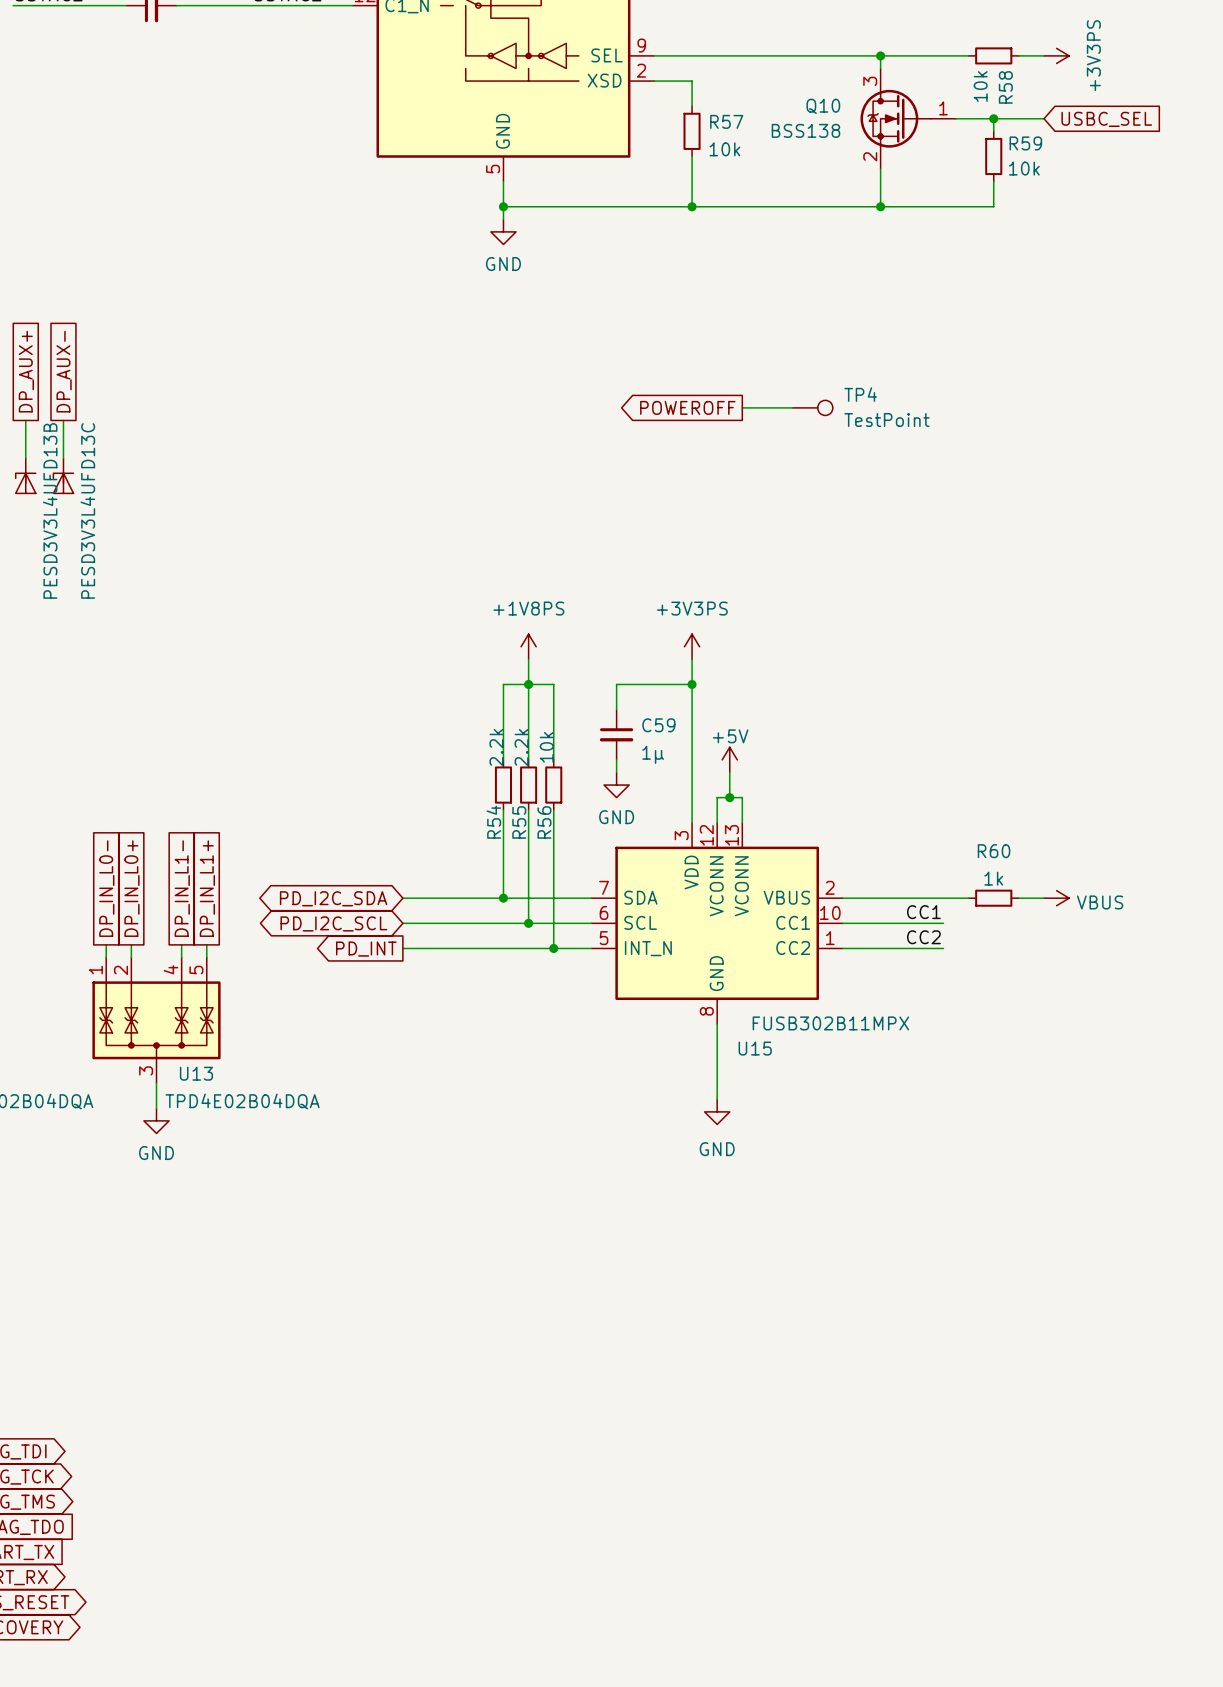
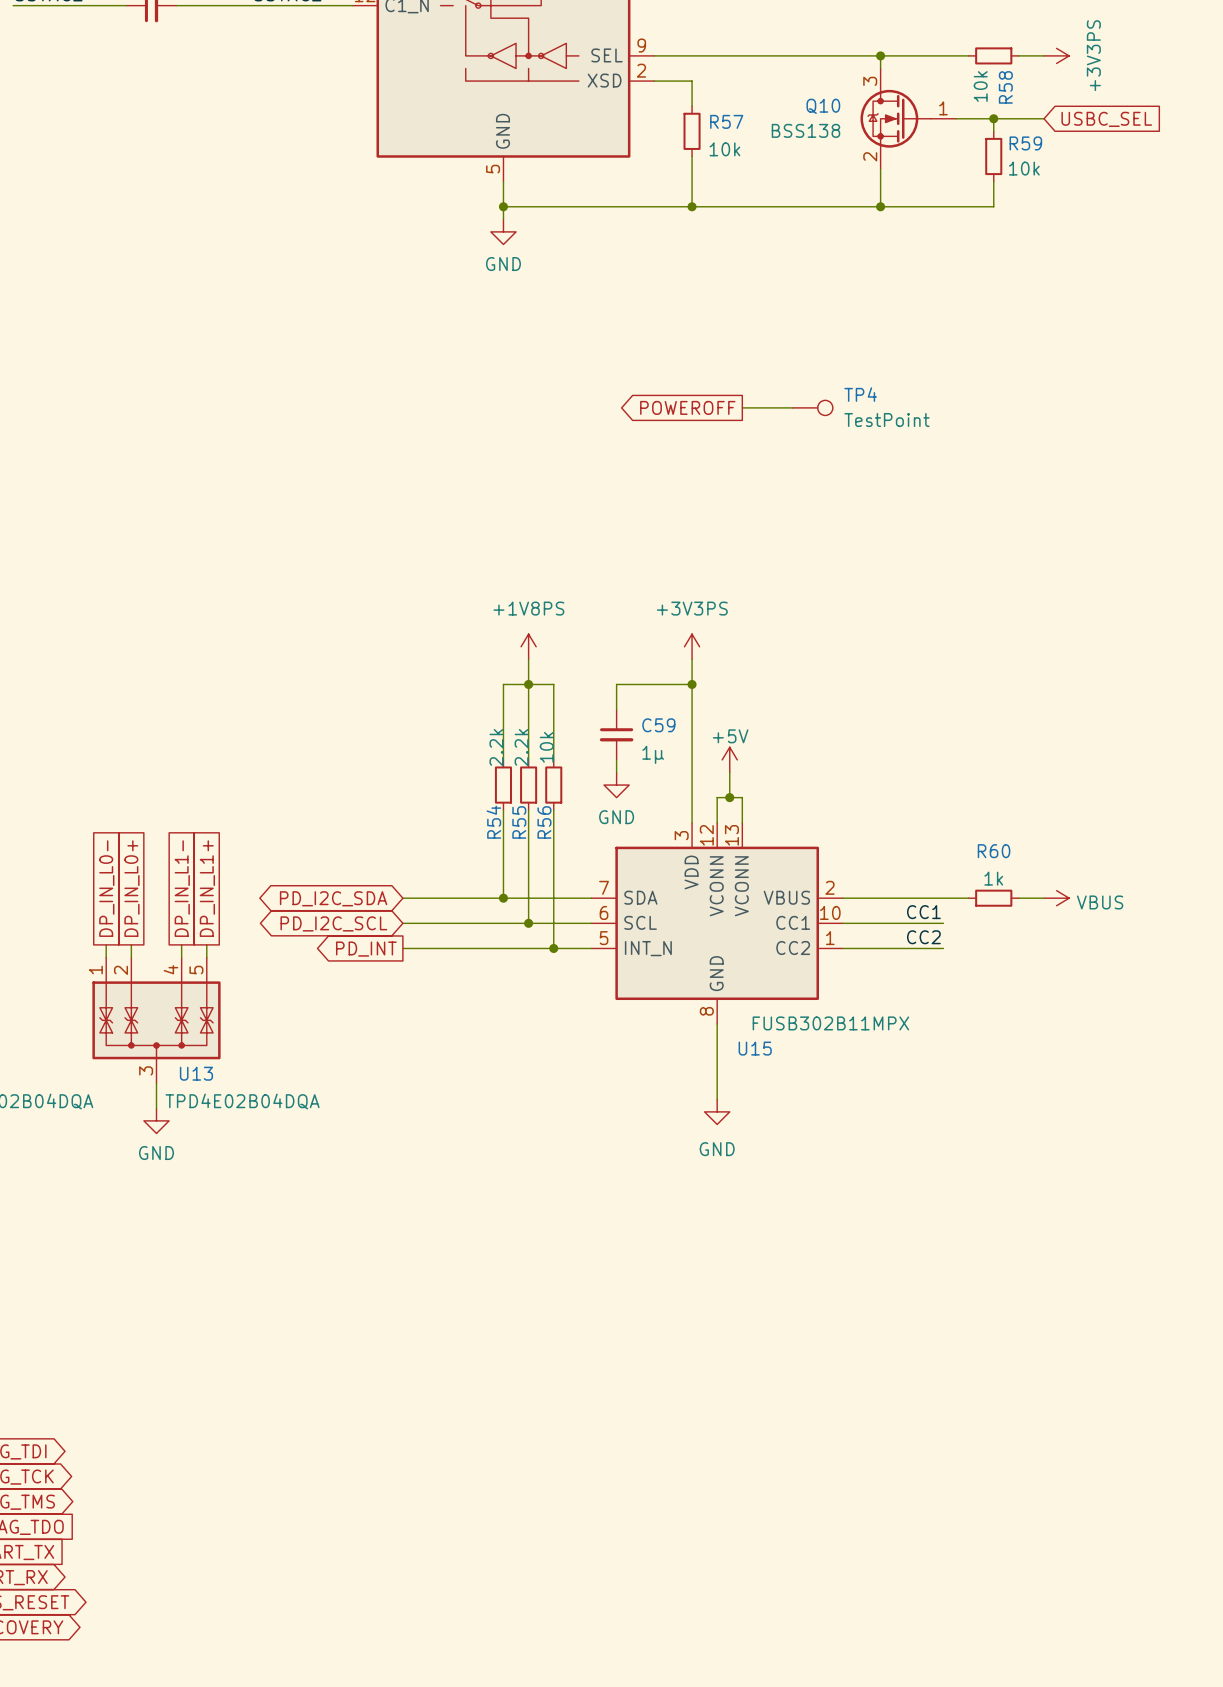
global label: DP_AUX+ (26, 371) -> none
global label: DP_AUX- (64, 371) -> none
wire: (25, 420) (25, 458) -> none
wire: (63, 420) (63, 458) -> none
D13B: PESD3V3L4UF (25, 475) -> none
D13C: PESD3V3L4UF (63, 475) -> none

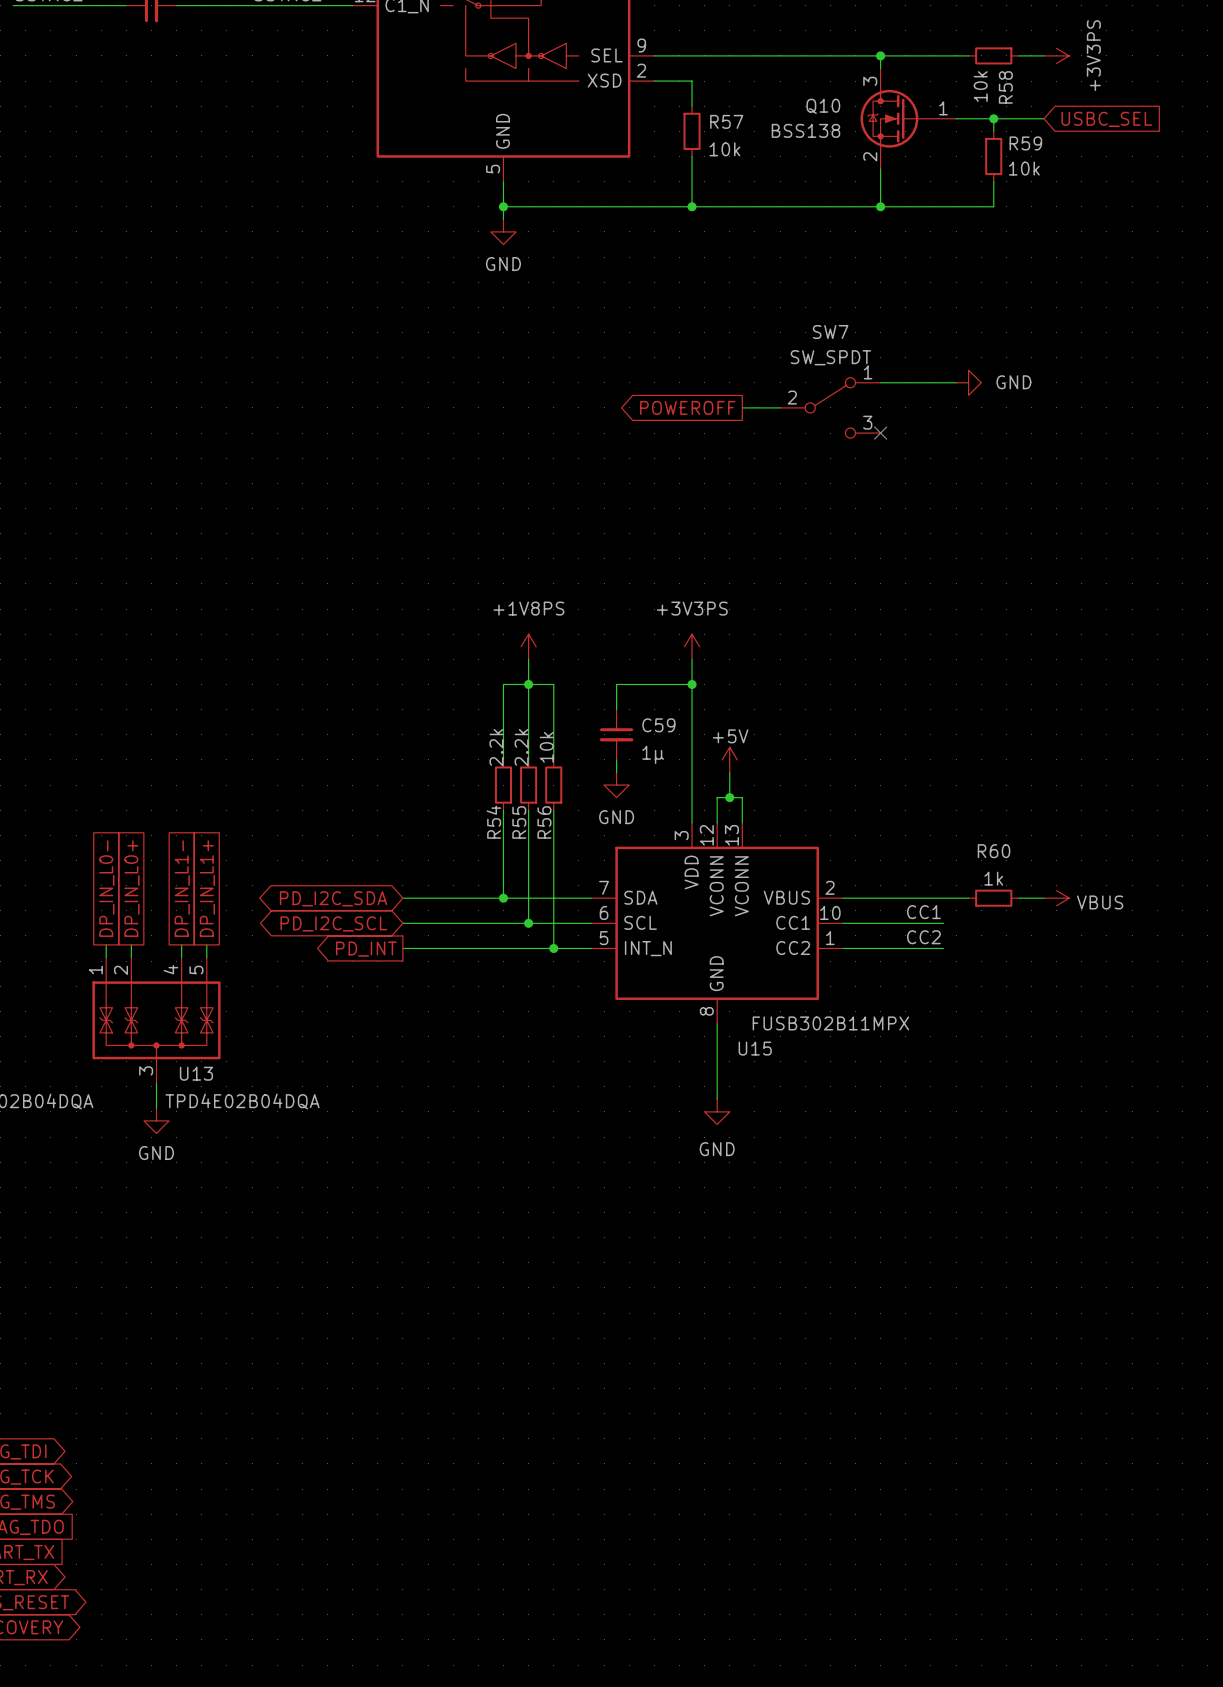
wire: none -> (880, 382) (956, 382)
power symbol: none -> GND (968, 382)
TP4: TestPoint (812, 407) -> none
SW7: none -> SW_SPDT (830, 407)
no-connect mark: none -> (880, 433)

